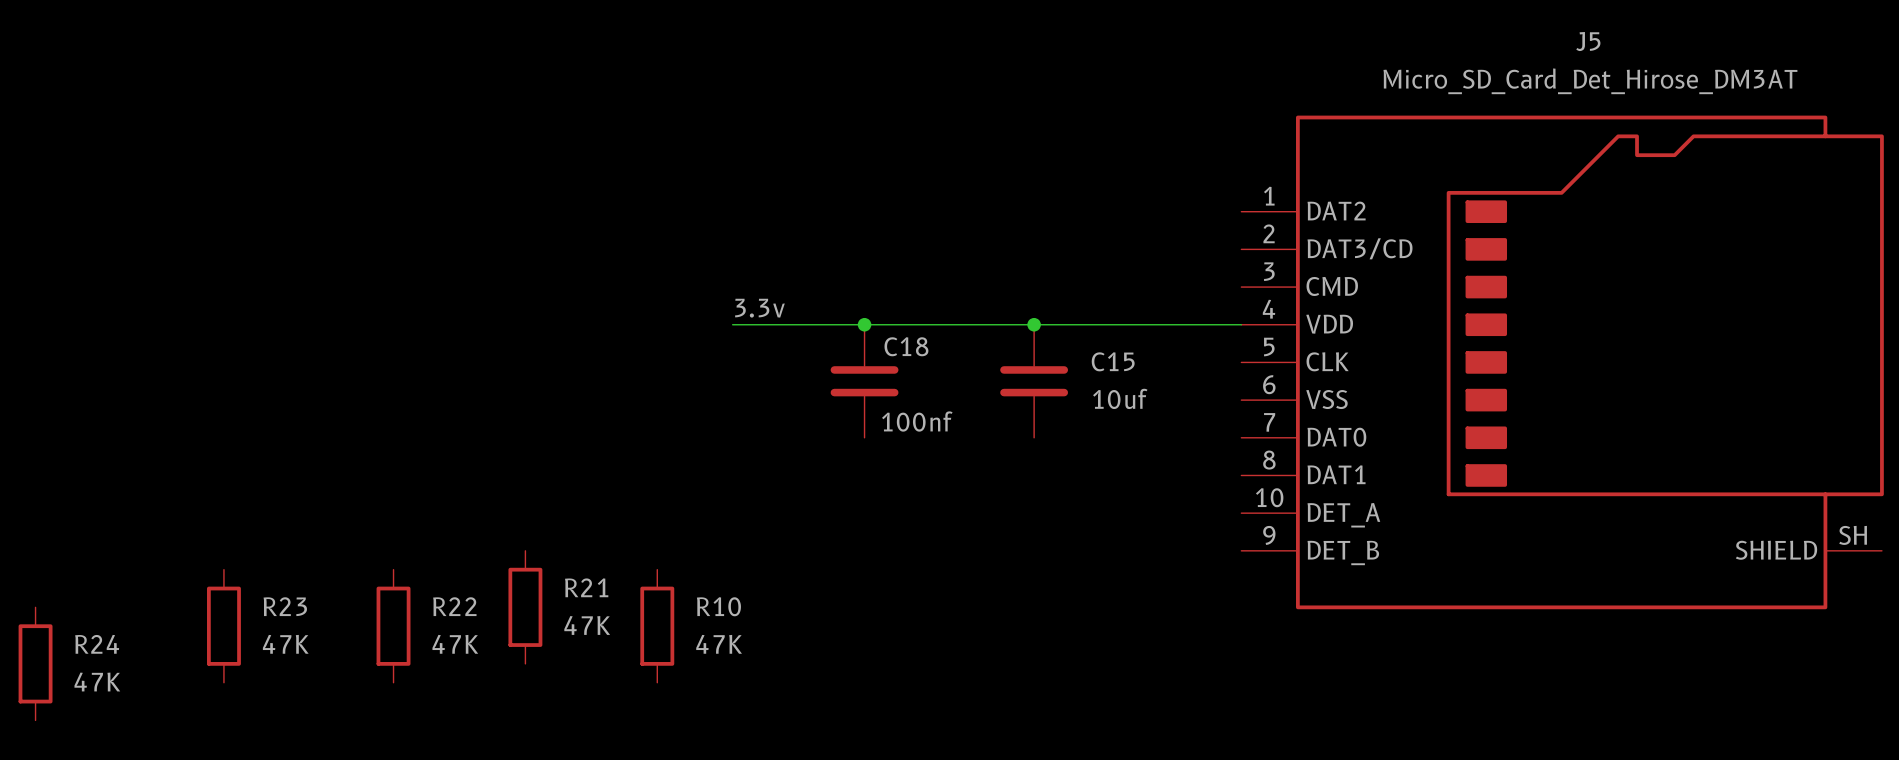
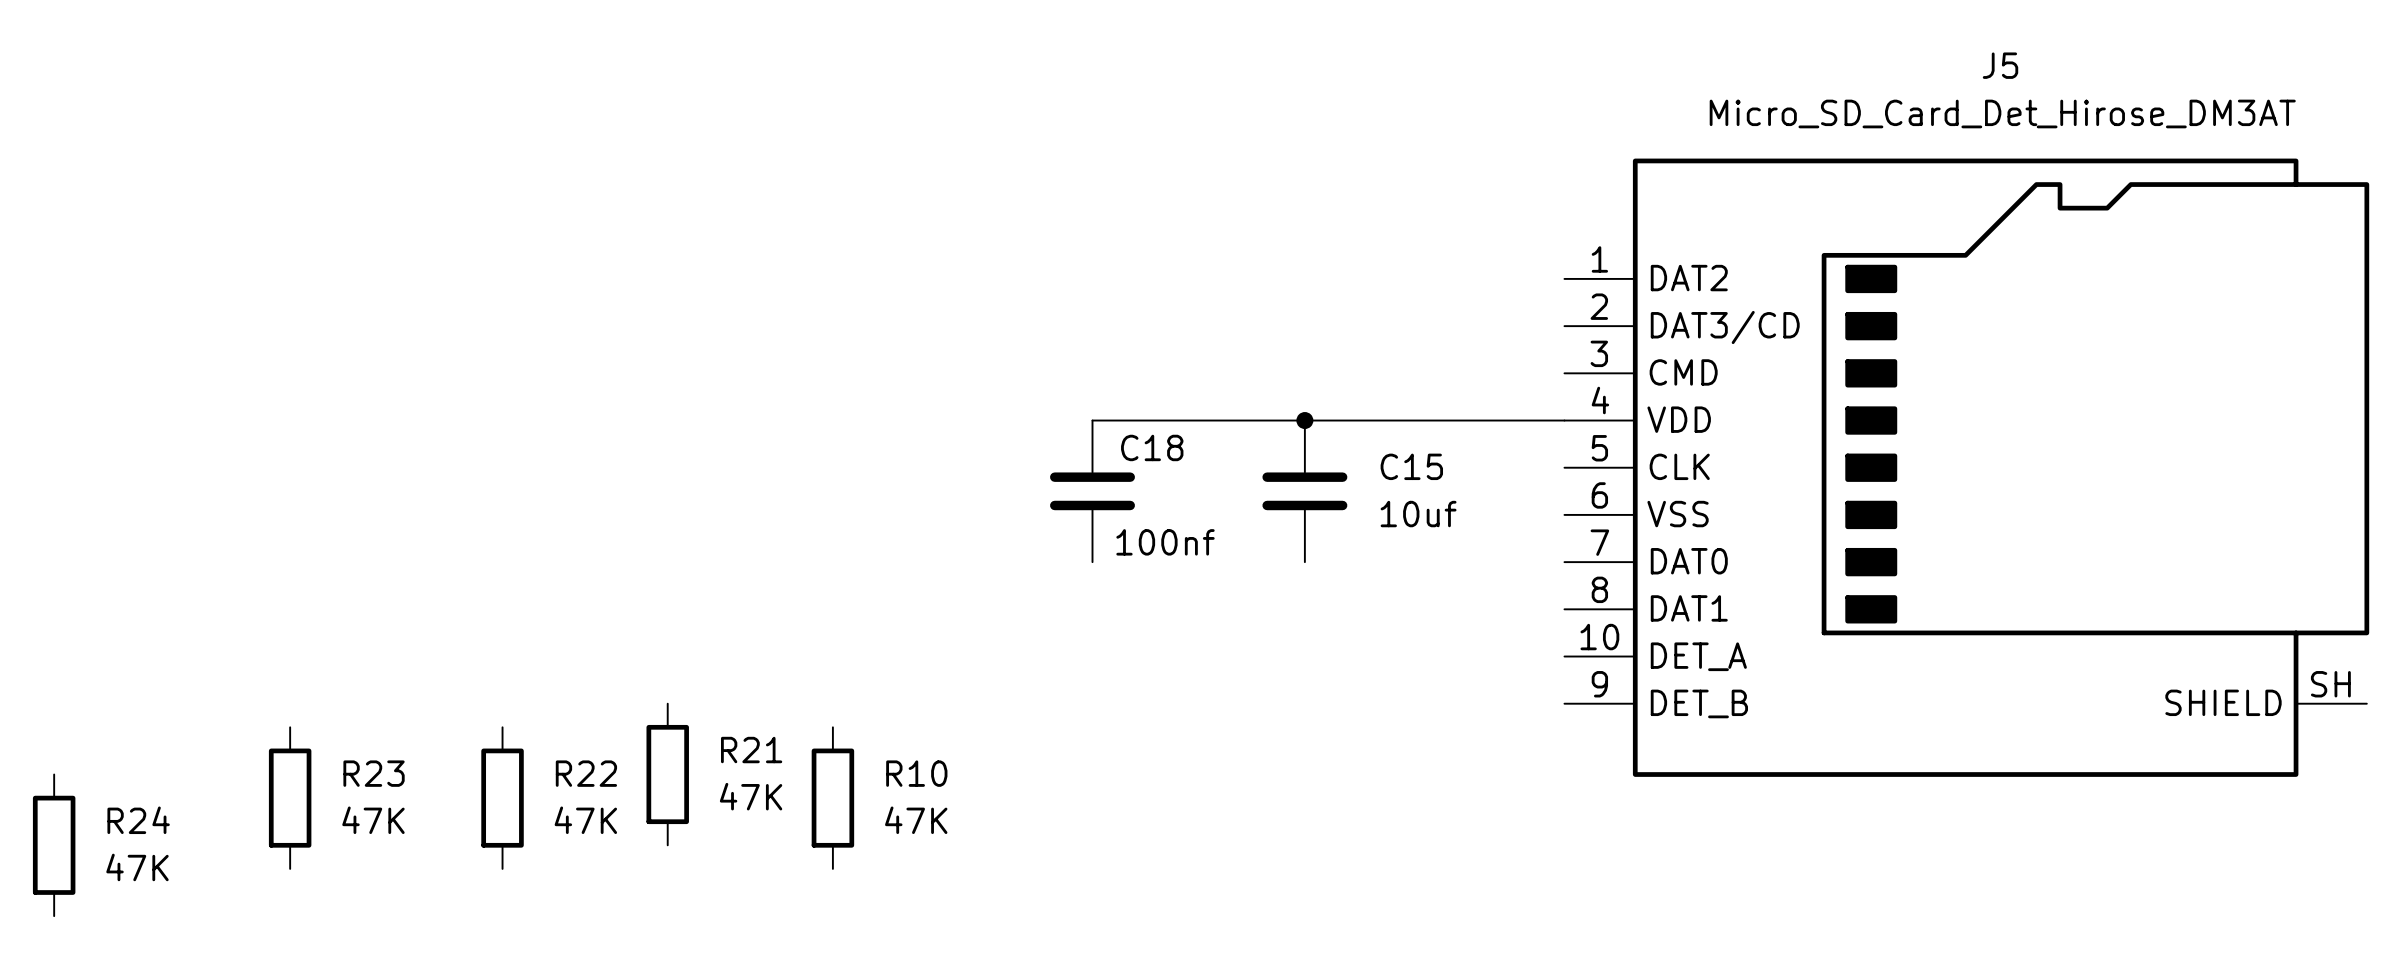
label: 3.3v (759, 308) -> none
wire: (732, 324) (864, 324) -> none
junction: (864, 324) -> none

